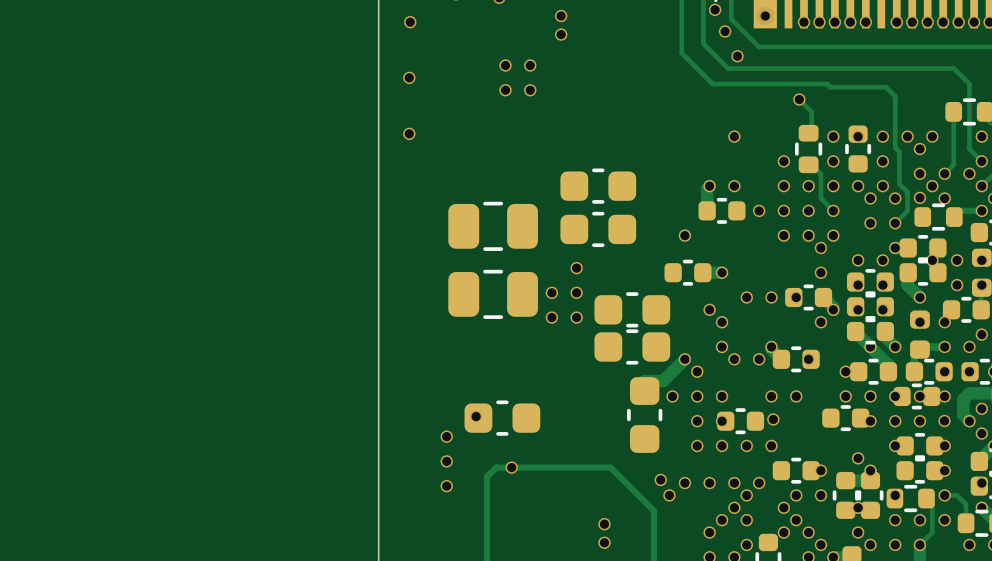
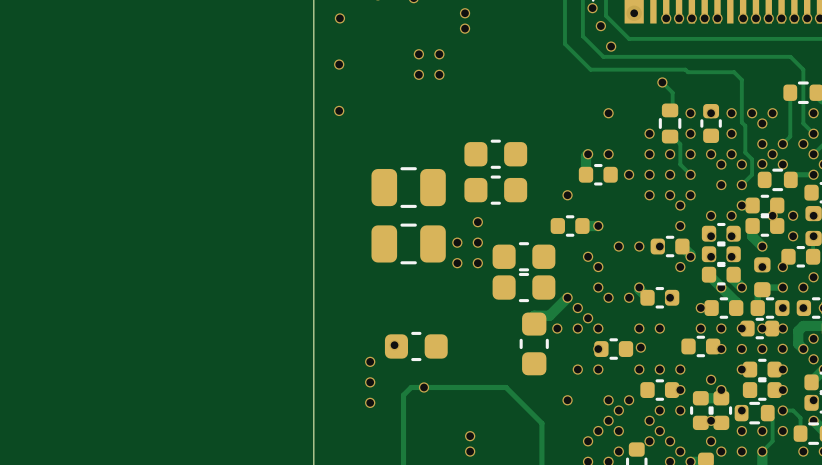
via: none -> (588, 318)
via: (697, 421) -> none
via: (746, 445) -> none
via: none -> (659, 369)
via: none -> (680, 369)
via: (660, 479) -> none
via: (709, 483) -> none
via: (669, 495) -> none
via: (604, 524) -> none
via: none -> (470, 436)
via: (604, 542) -> none
via: none -> (470, 451)

